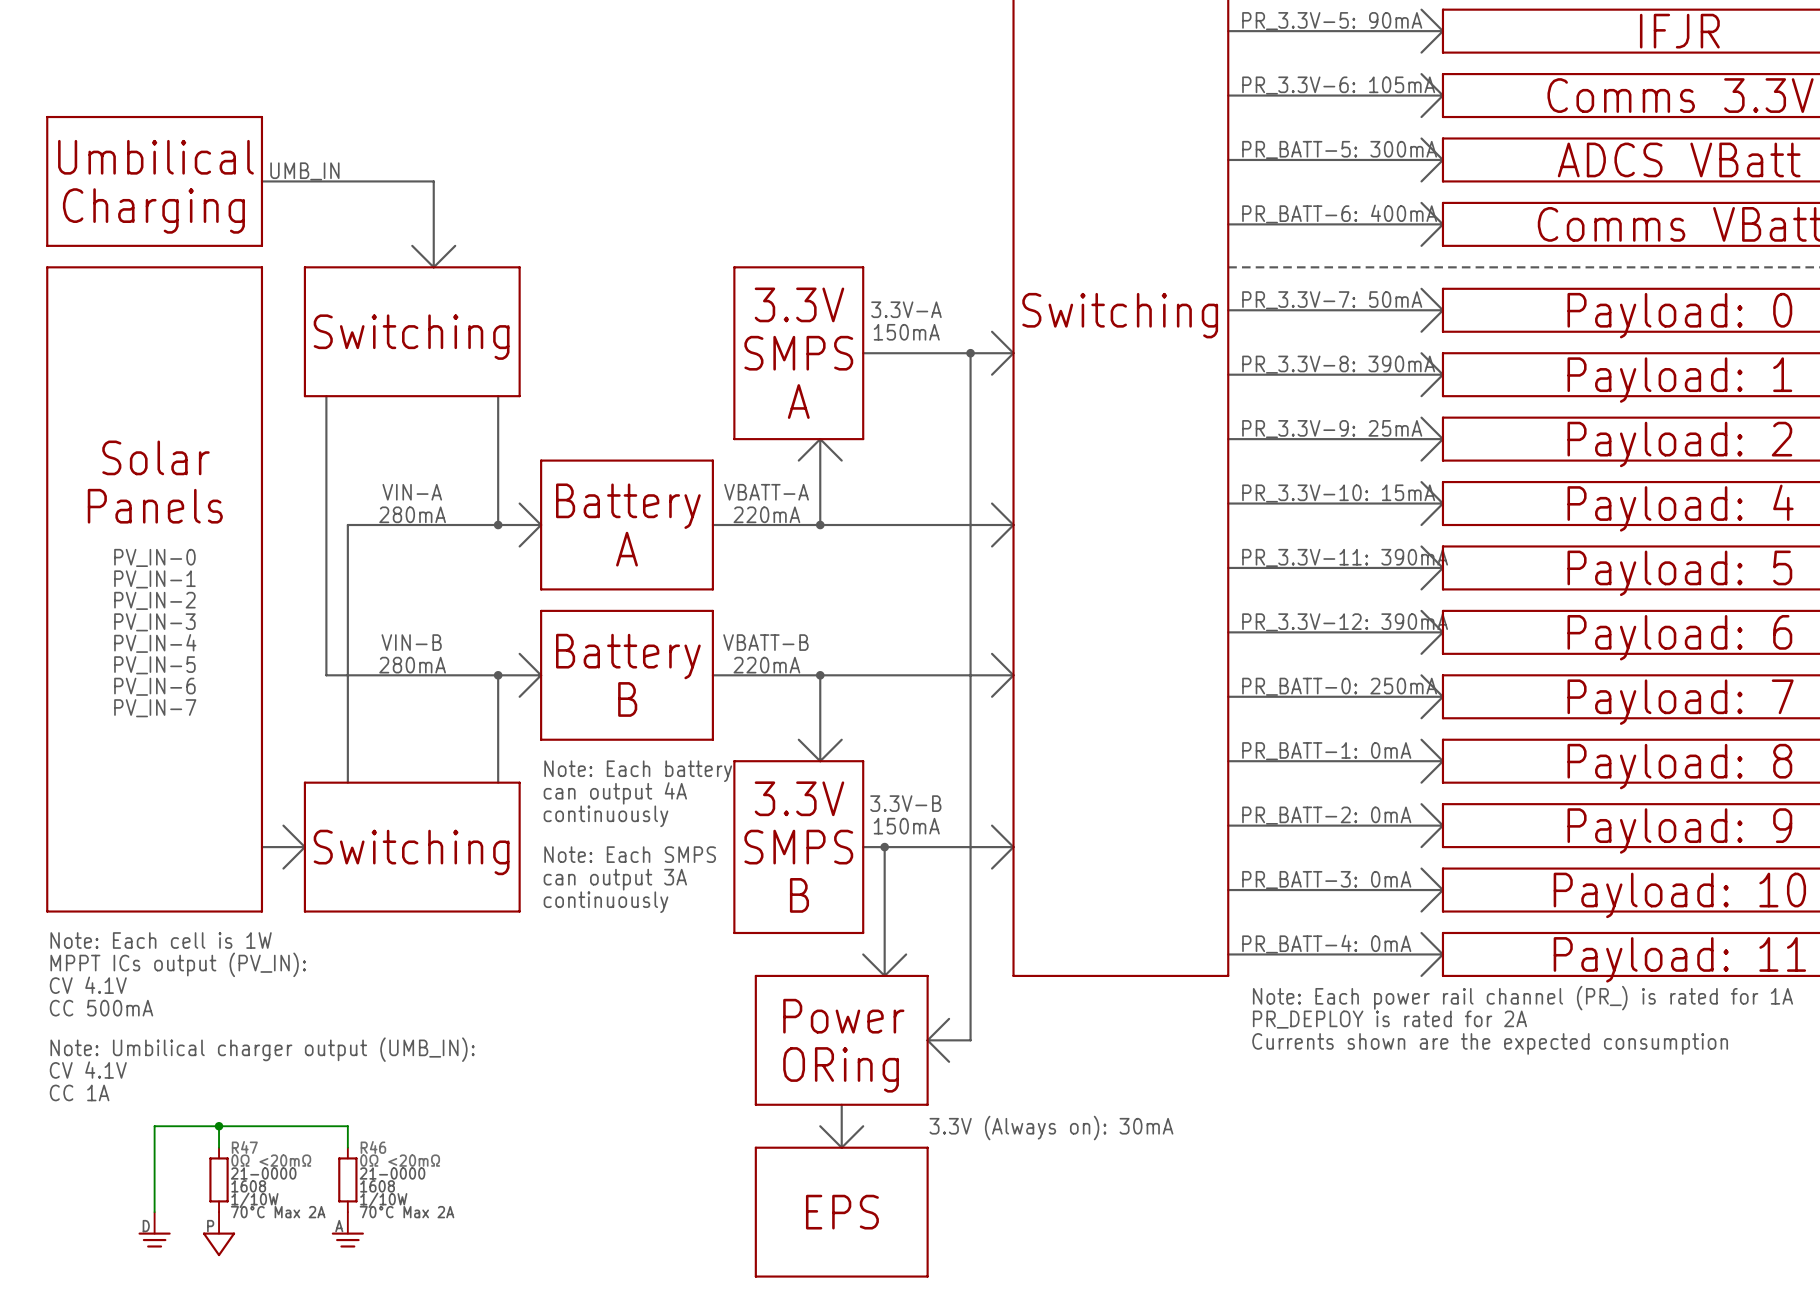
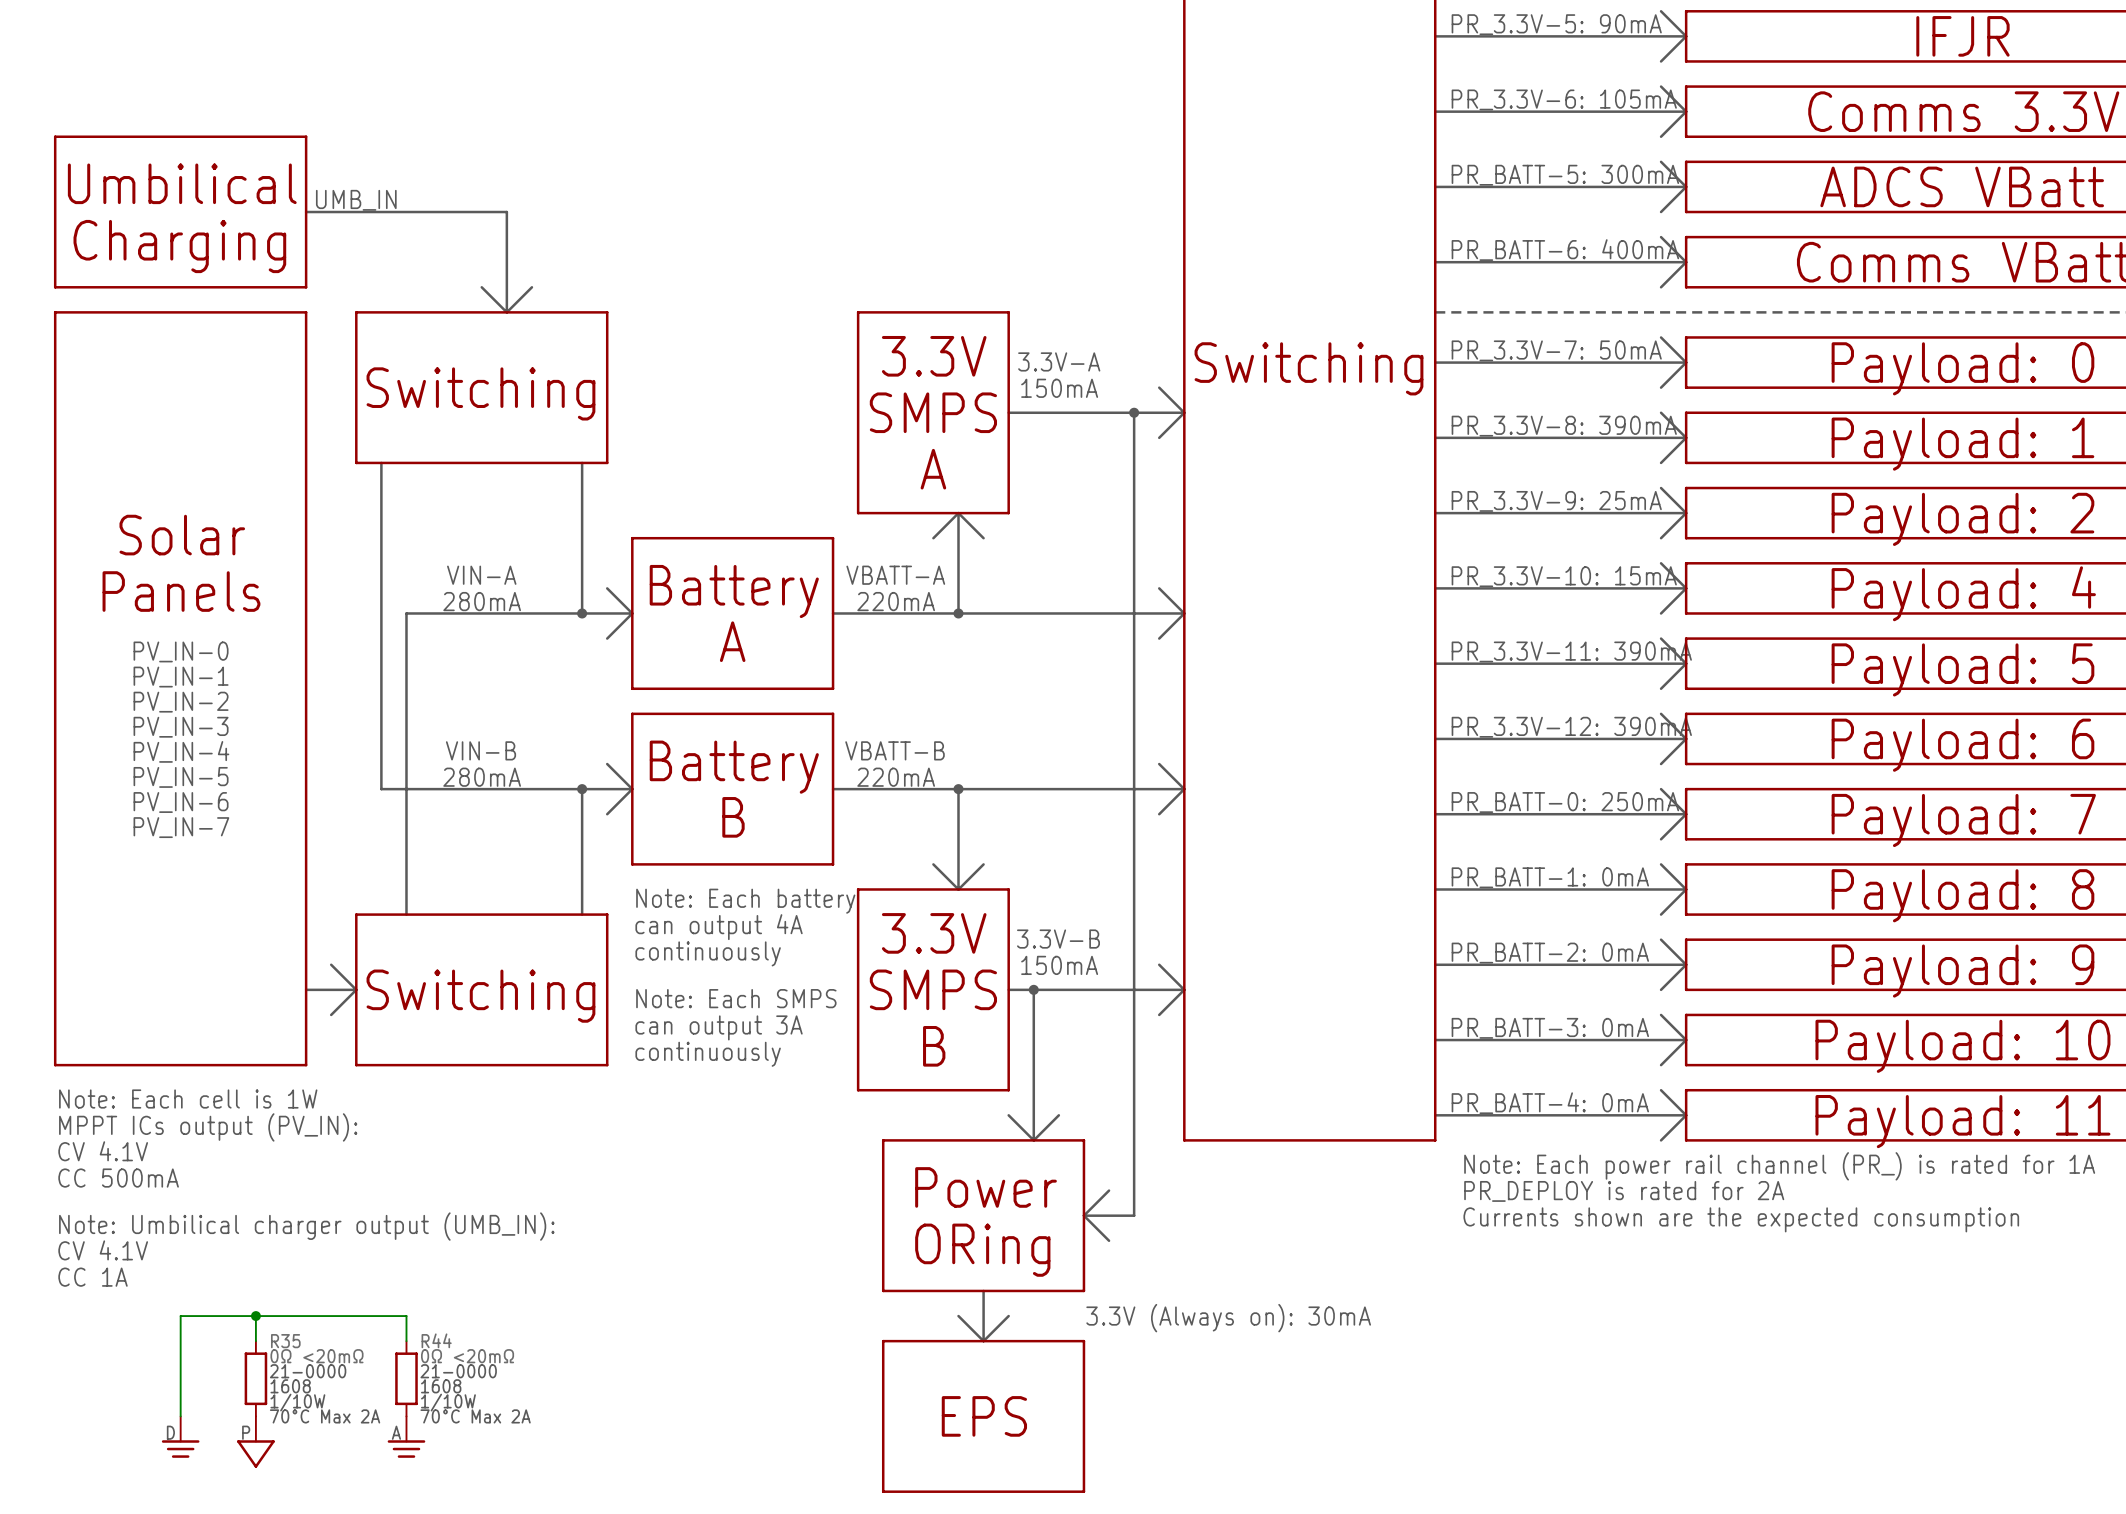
R47 name: R47 (244, 1147) -> R35 (285, 1341)
R46 name: R46 (373, 1147) -> R44 (436, 1340)

